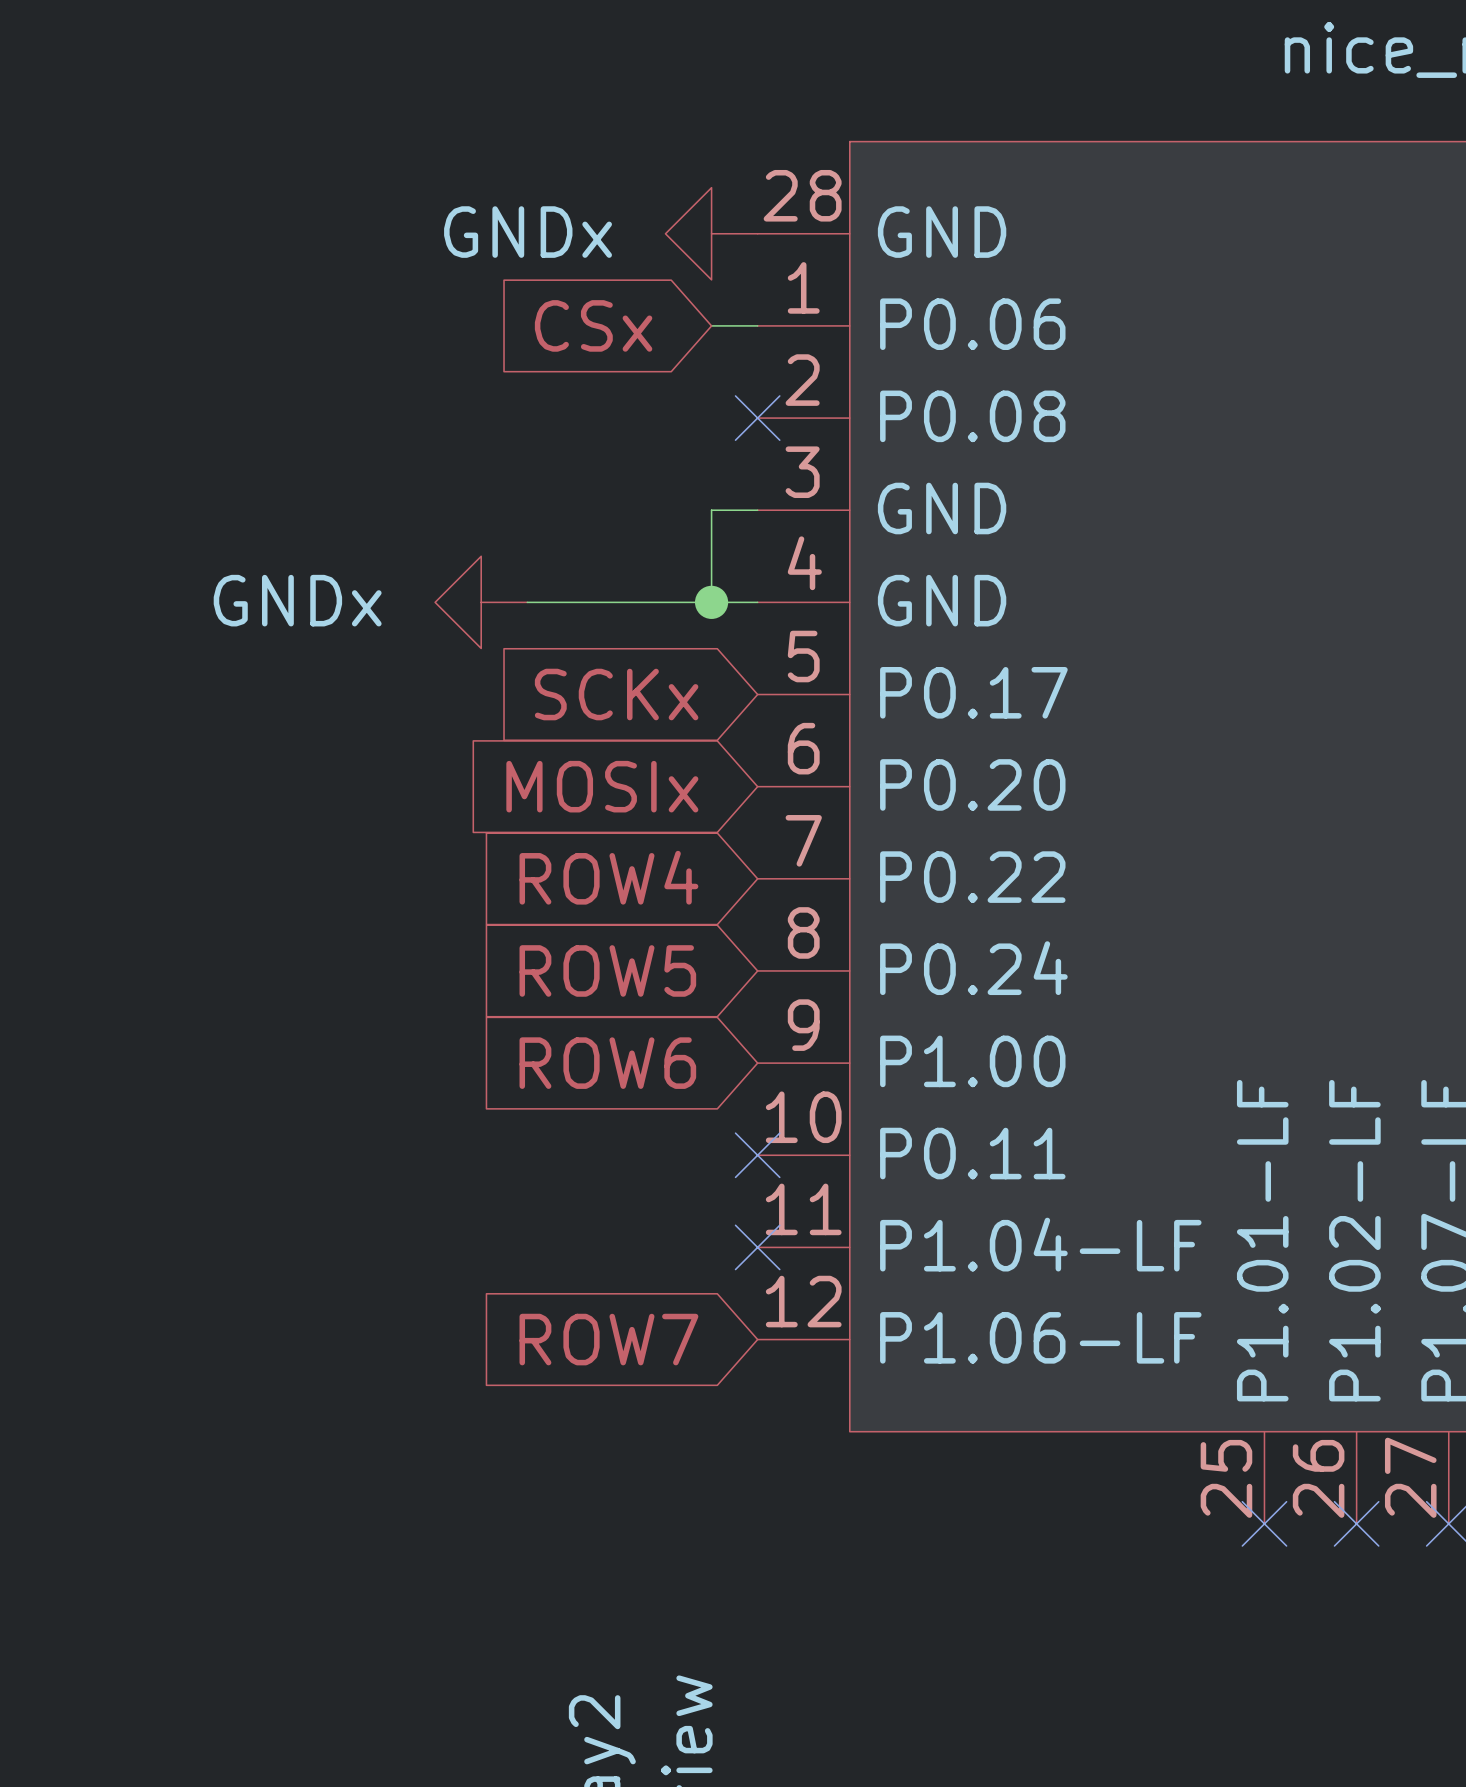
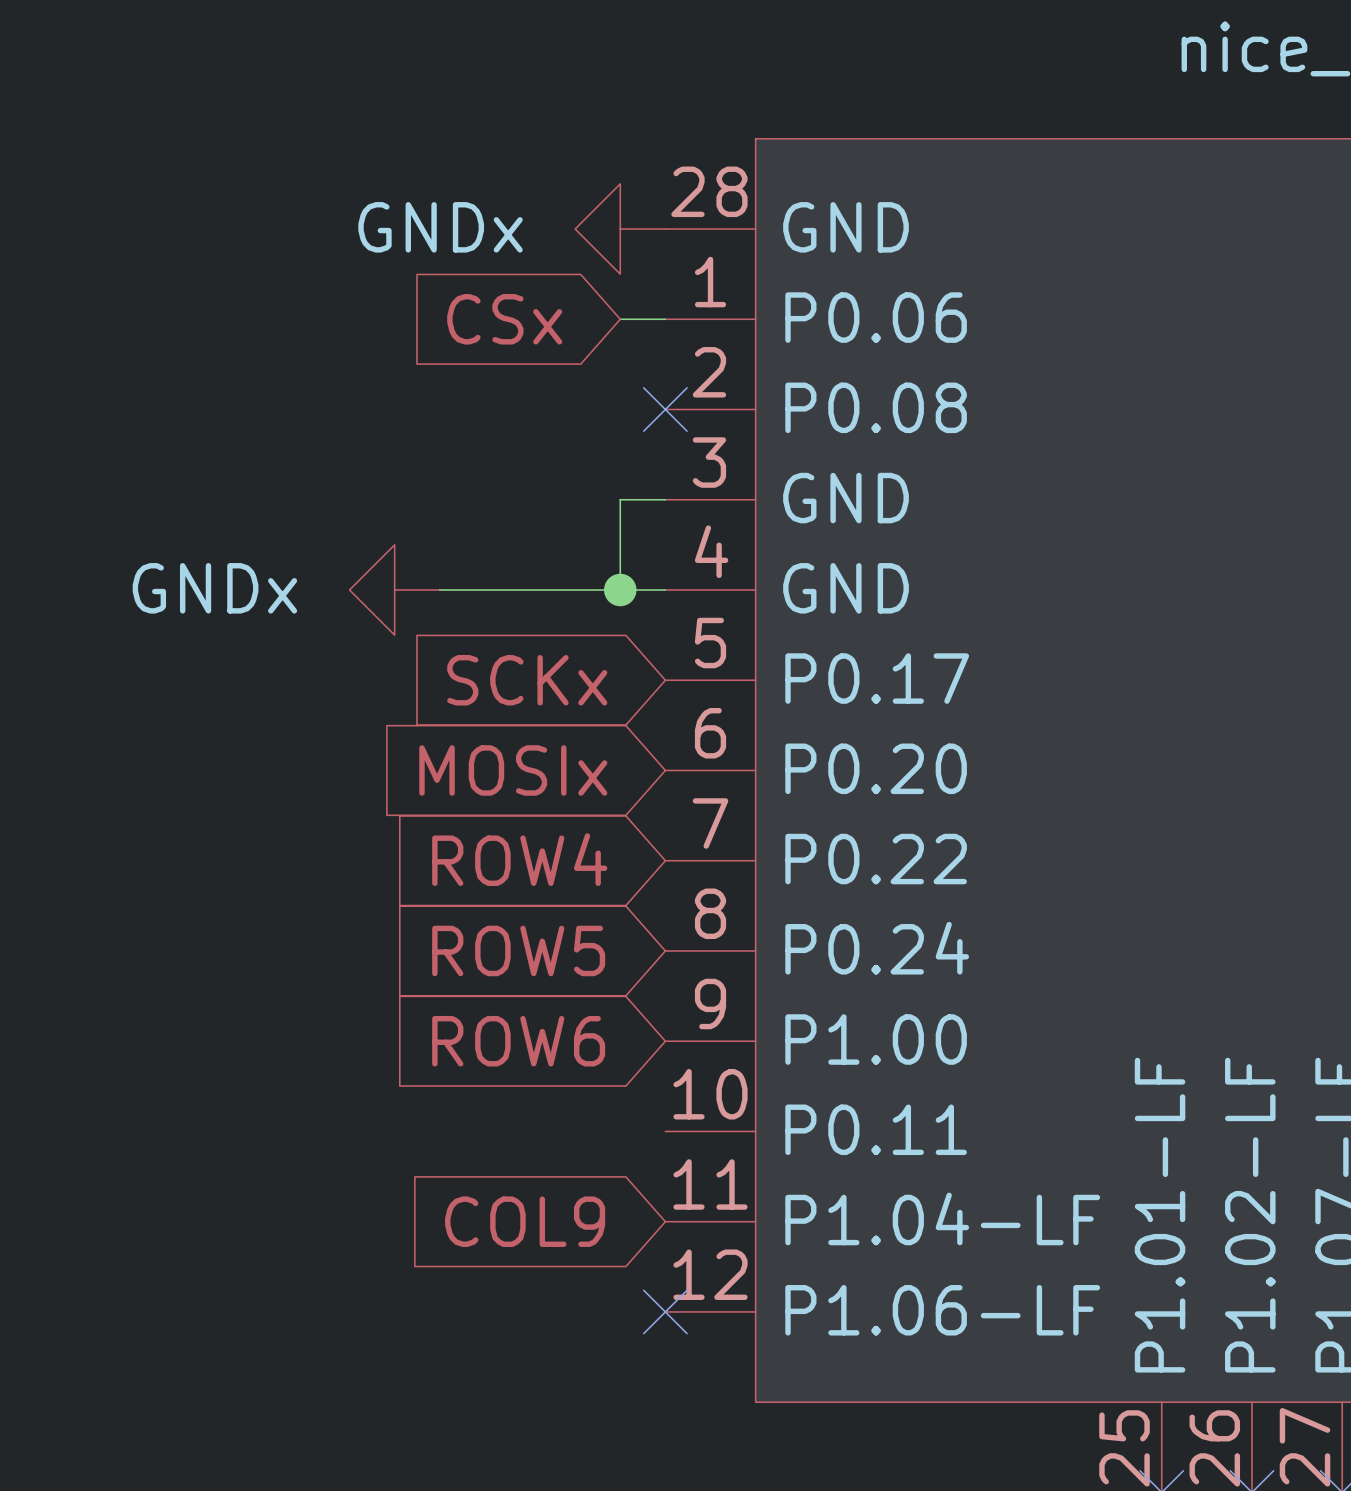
no-connect mark: (757, 1155) -> none
global label: none -> COL9 (525, 1221)
no-connect mark: (757, 1247) -> none
global label: ROW7 (608, 1339) -> none
no-connect mark: none -> (665, 1311)

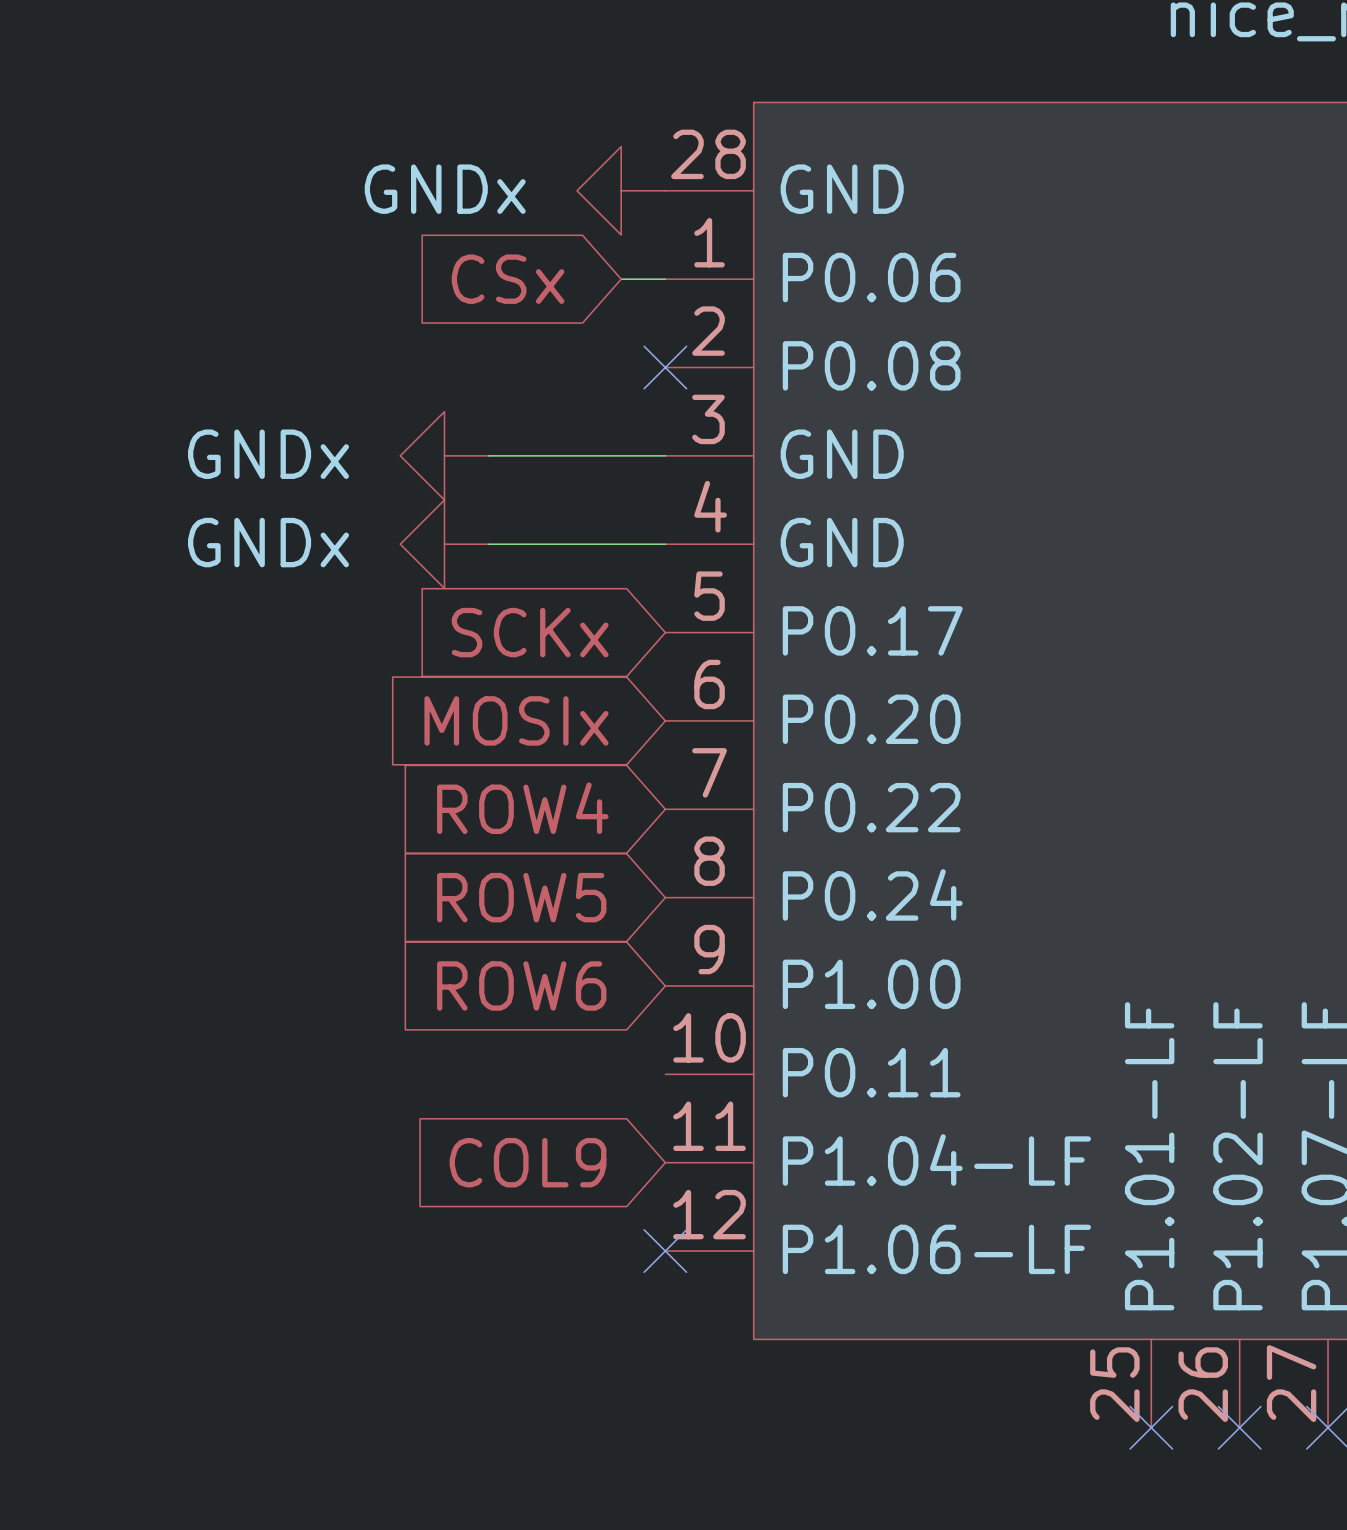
power symbol: none -> GNDx (444, 455)
wire: (620, 499) (620, 590) -> (621, 455) (488, 455)
power symbol position: GNDx (394, 590) -> GNDx (444, 544)
junction: (620, 590) -> none

